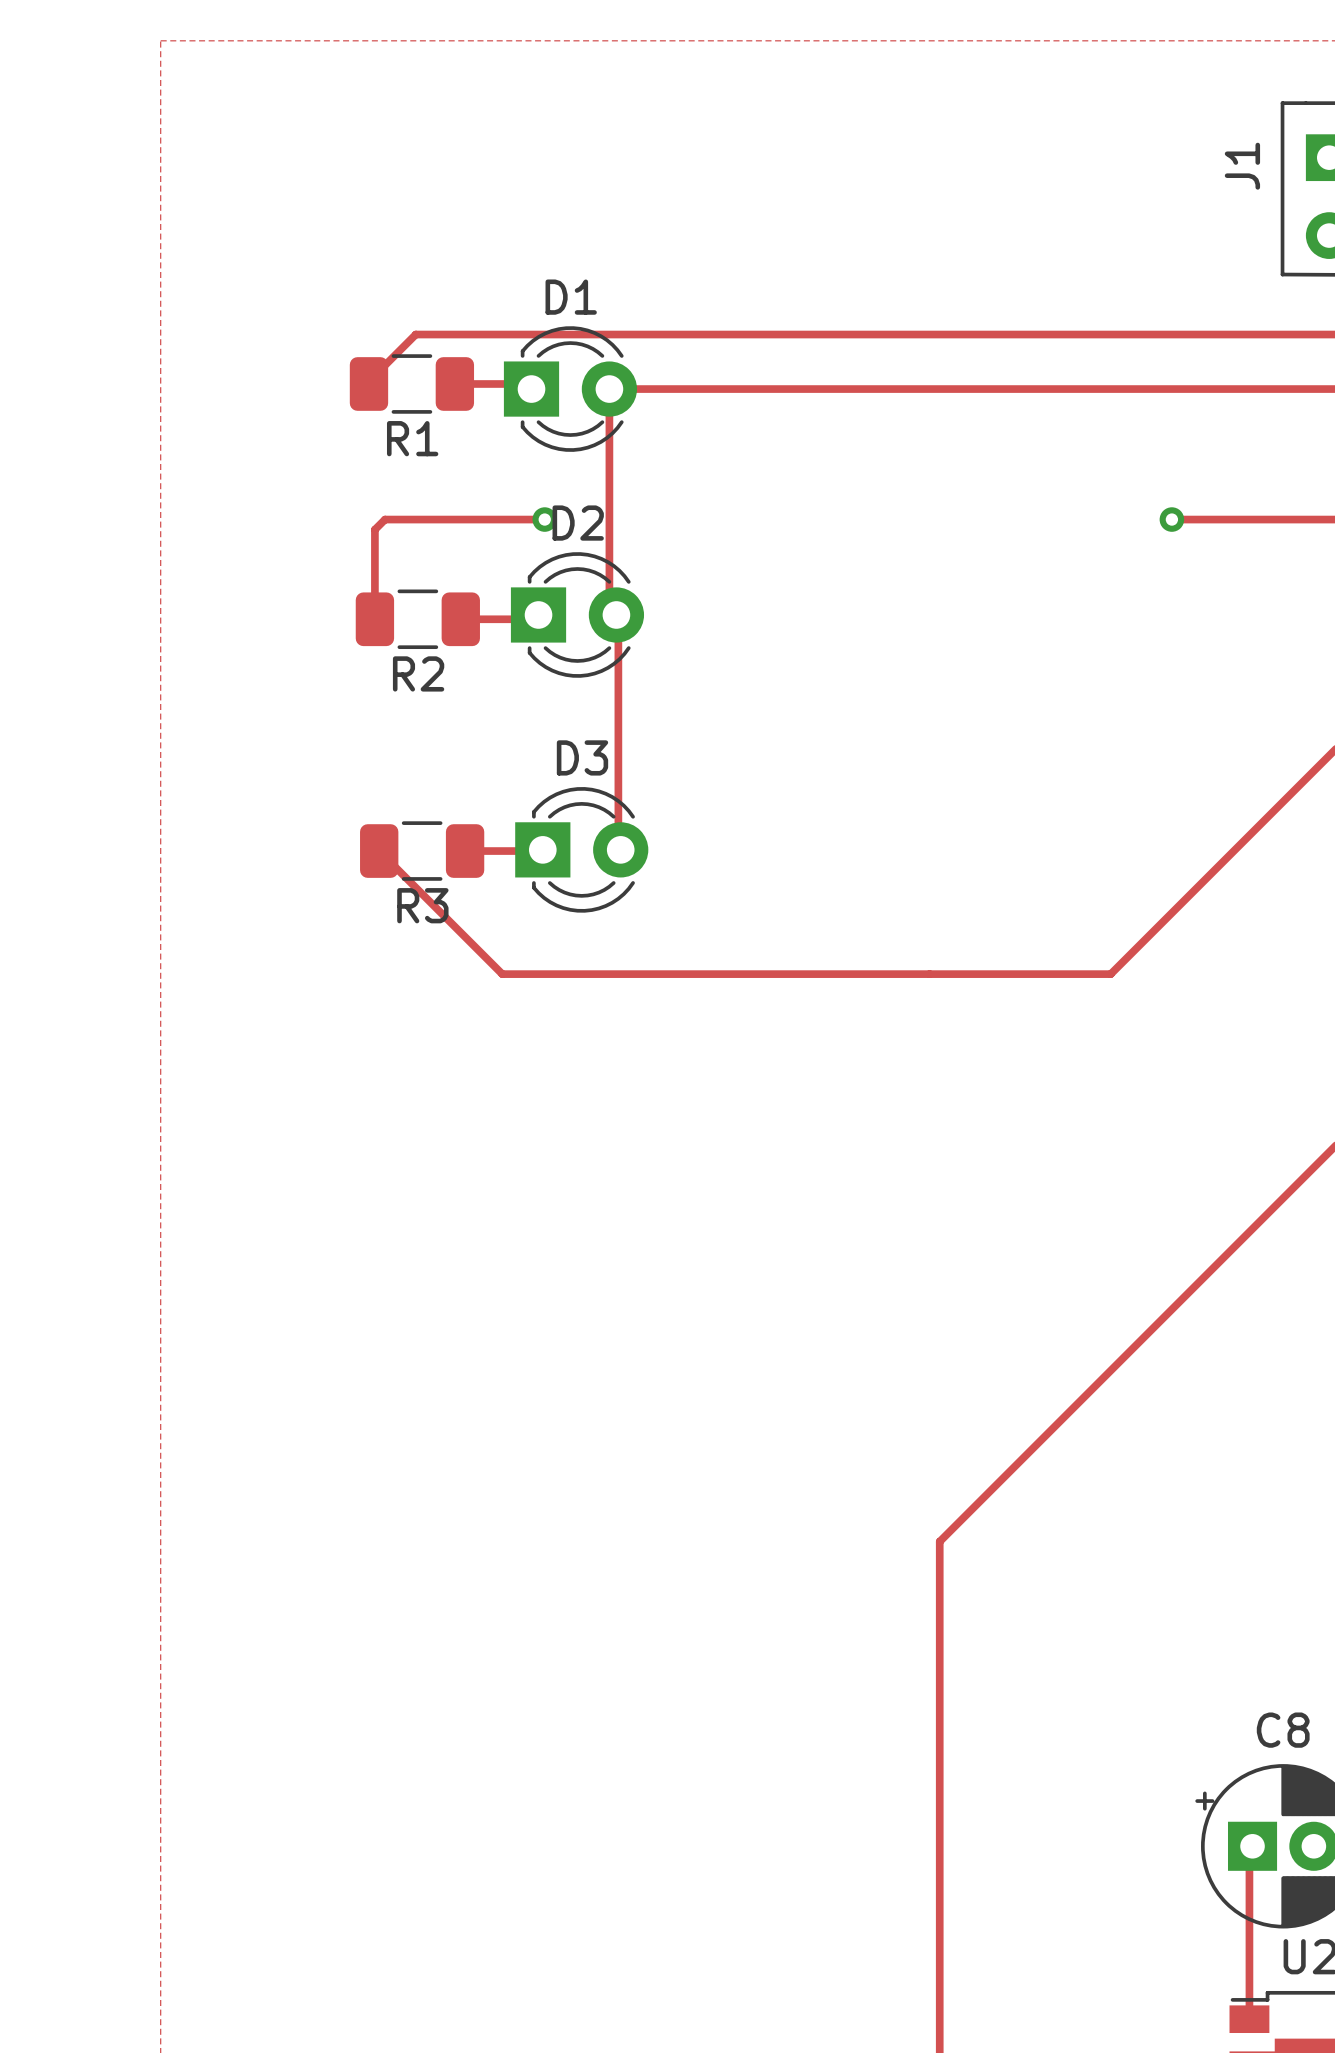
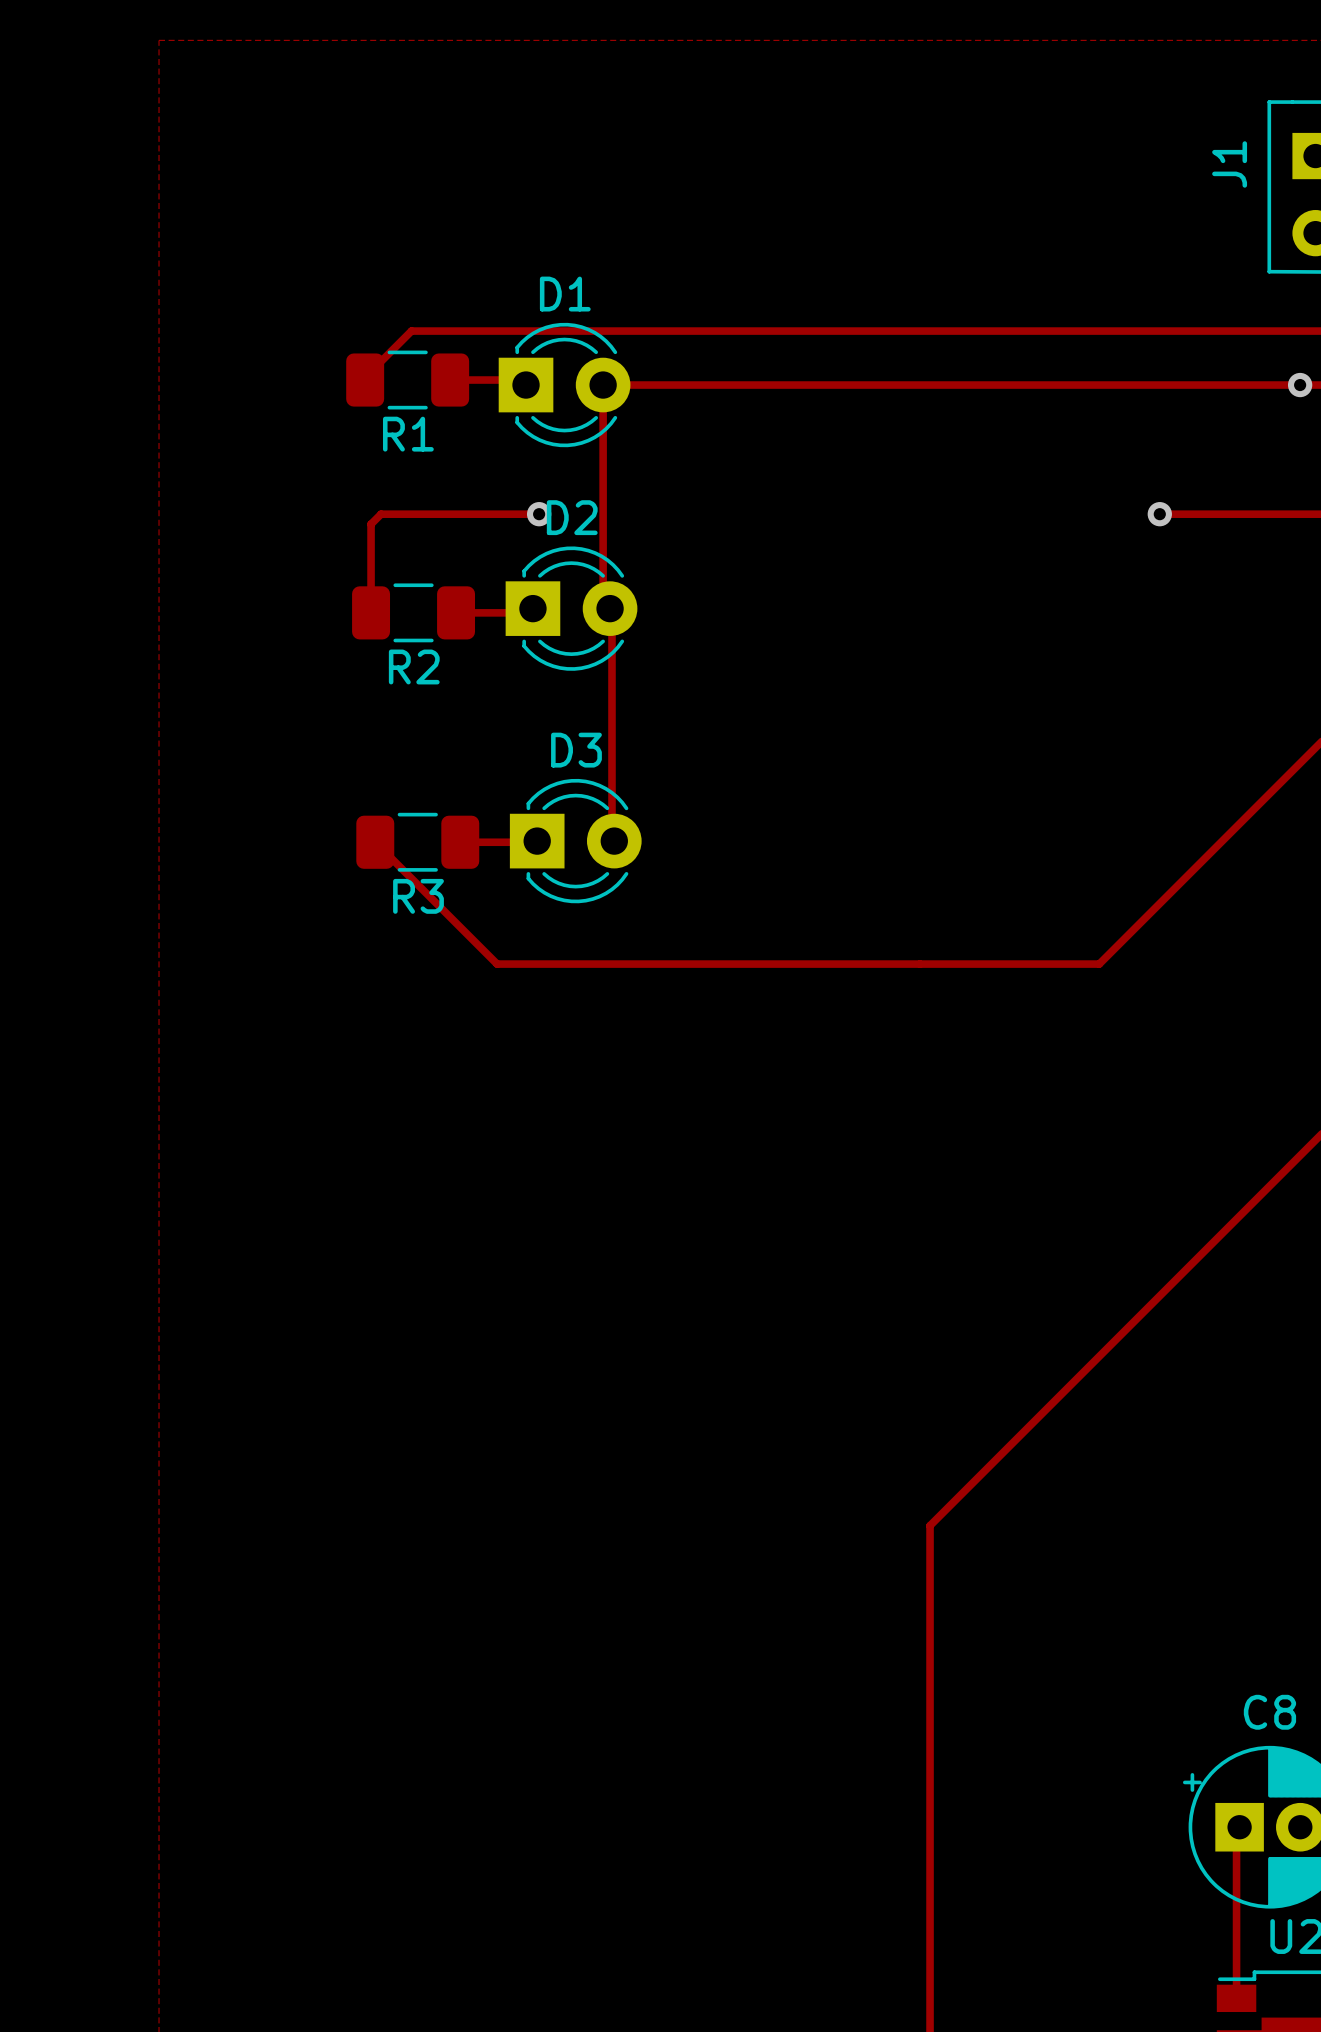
via: none -> (1300, 385)

